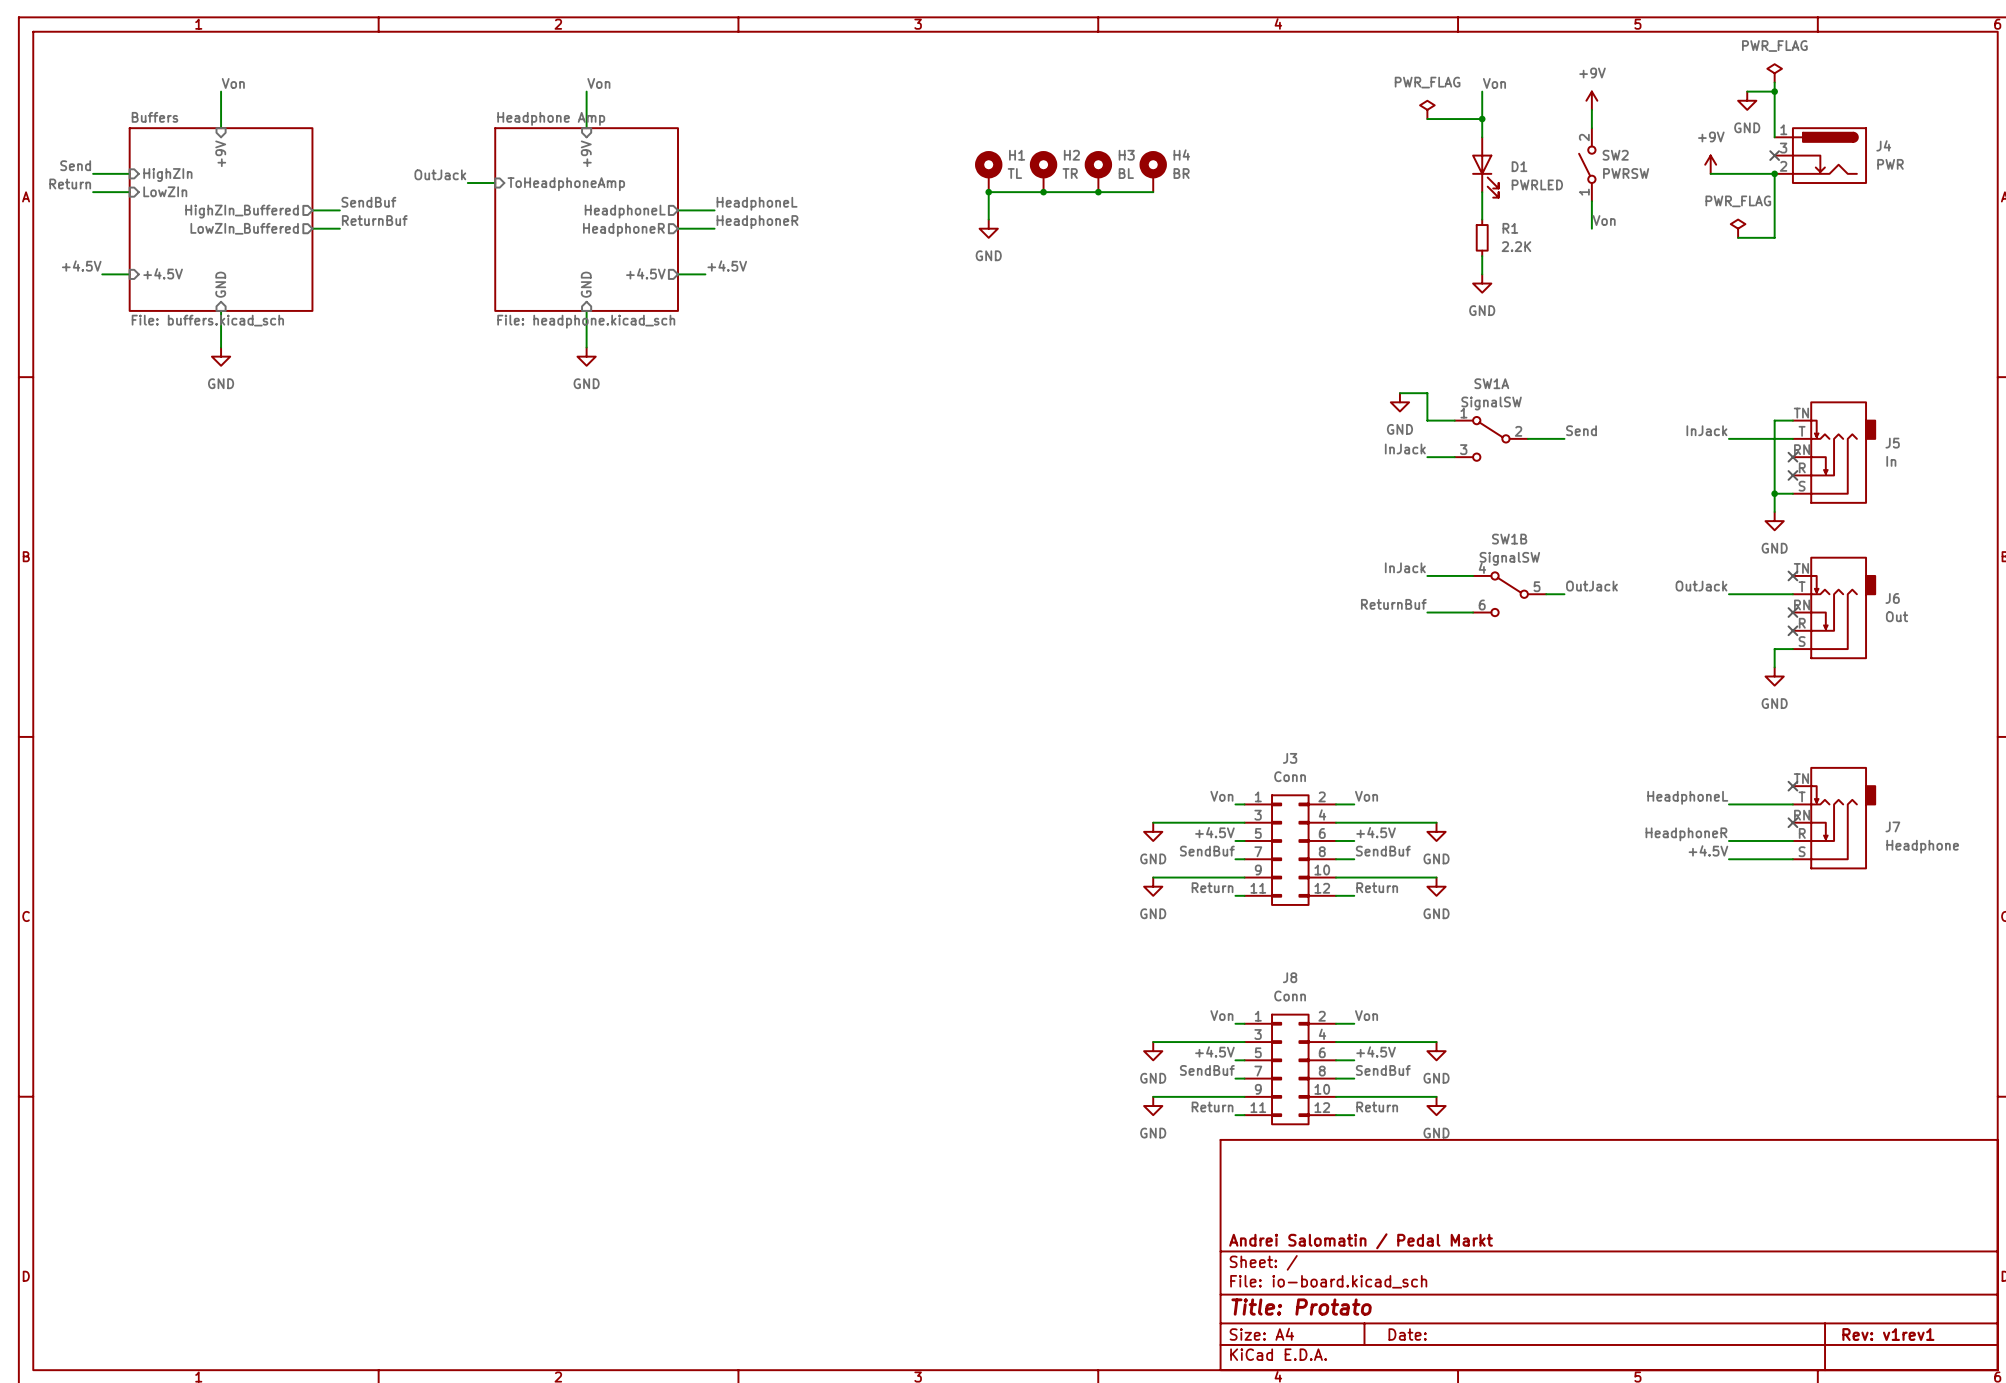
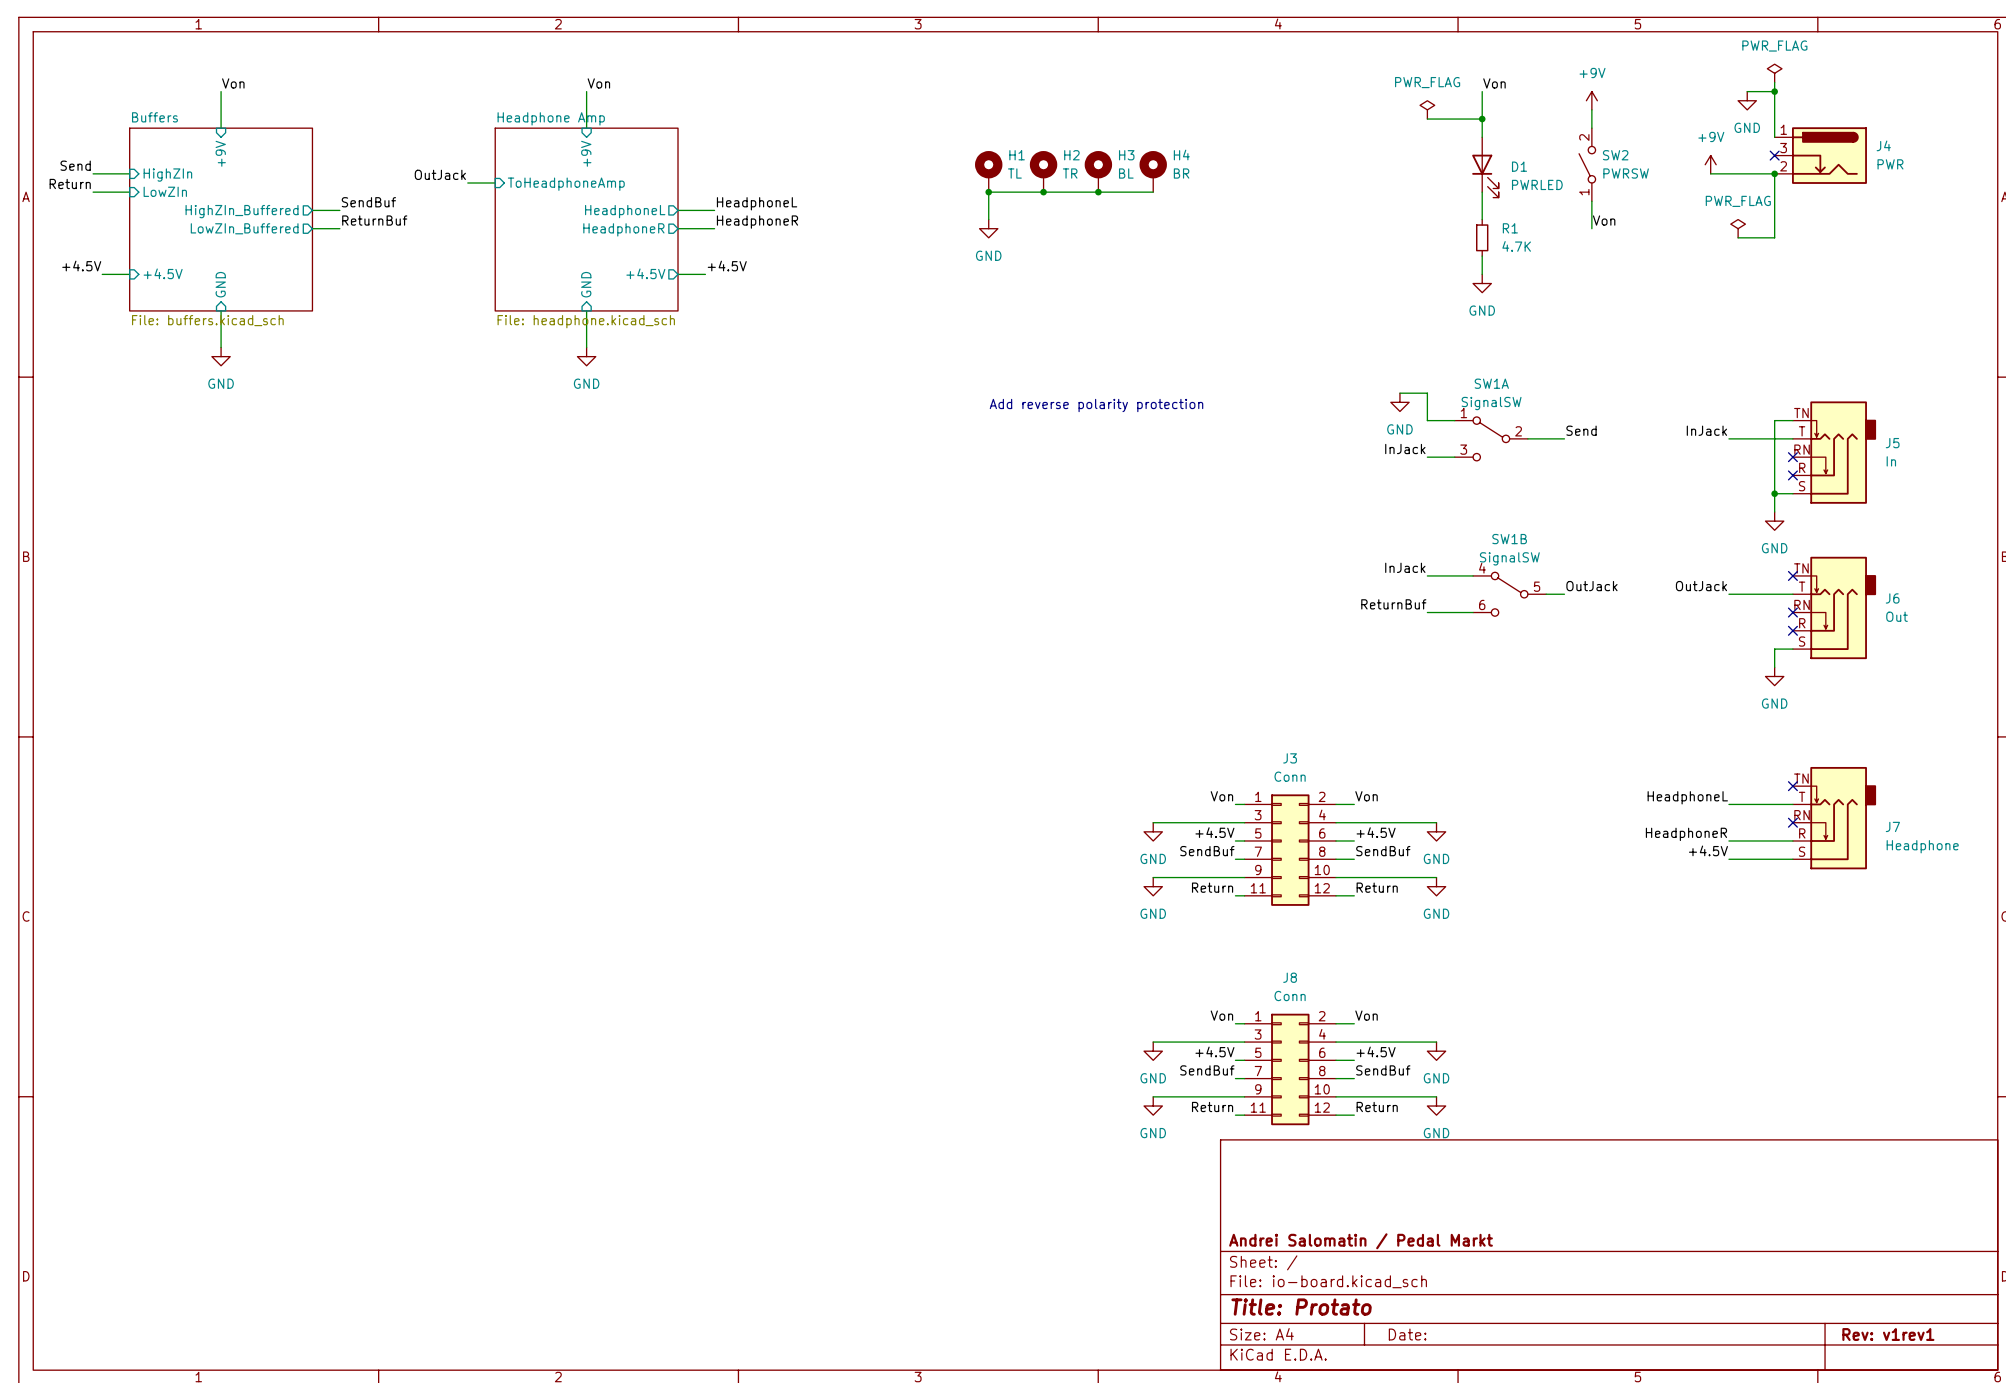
R1 value: 2.2K (1516, 246) -> 4.7K (1516, 246)
text: none -> Add reverse polarity protection (1096, 405)

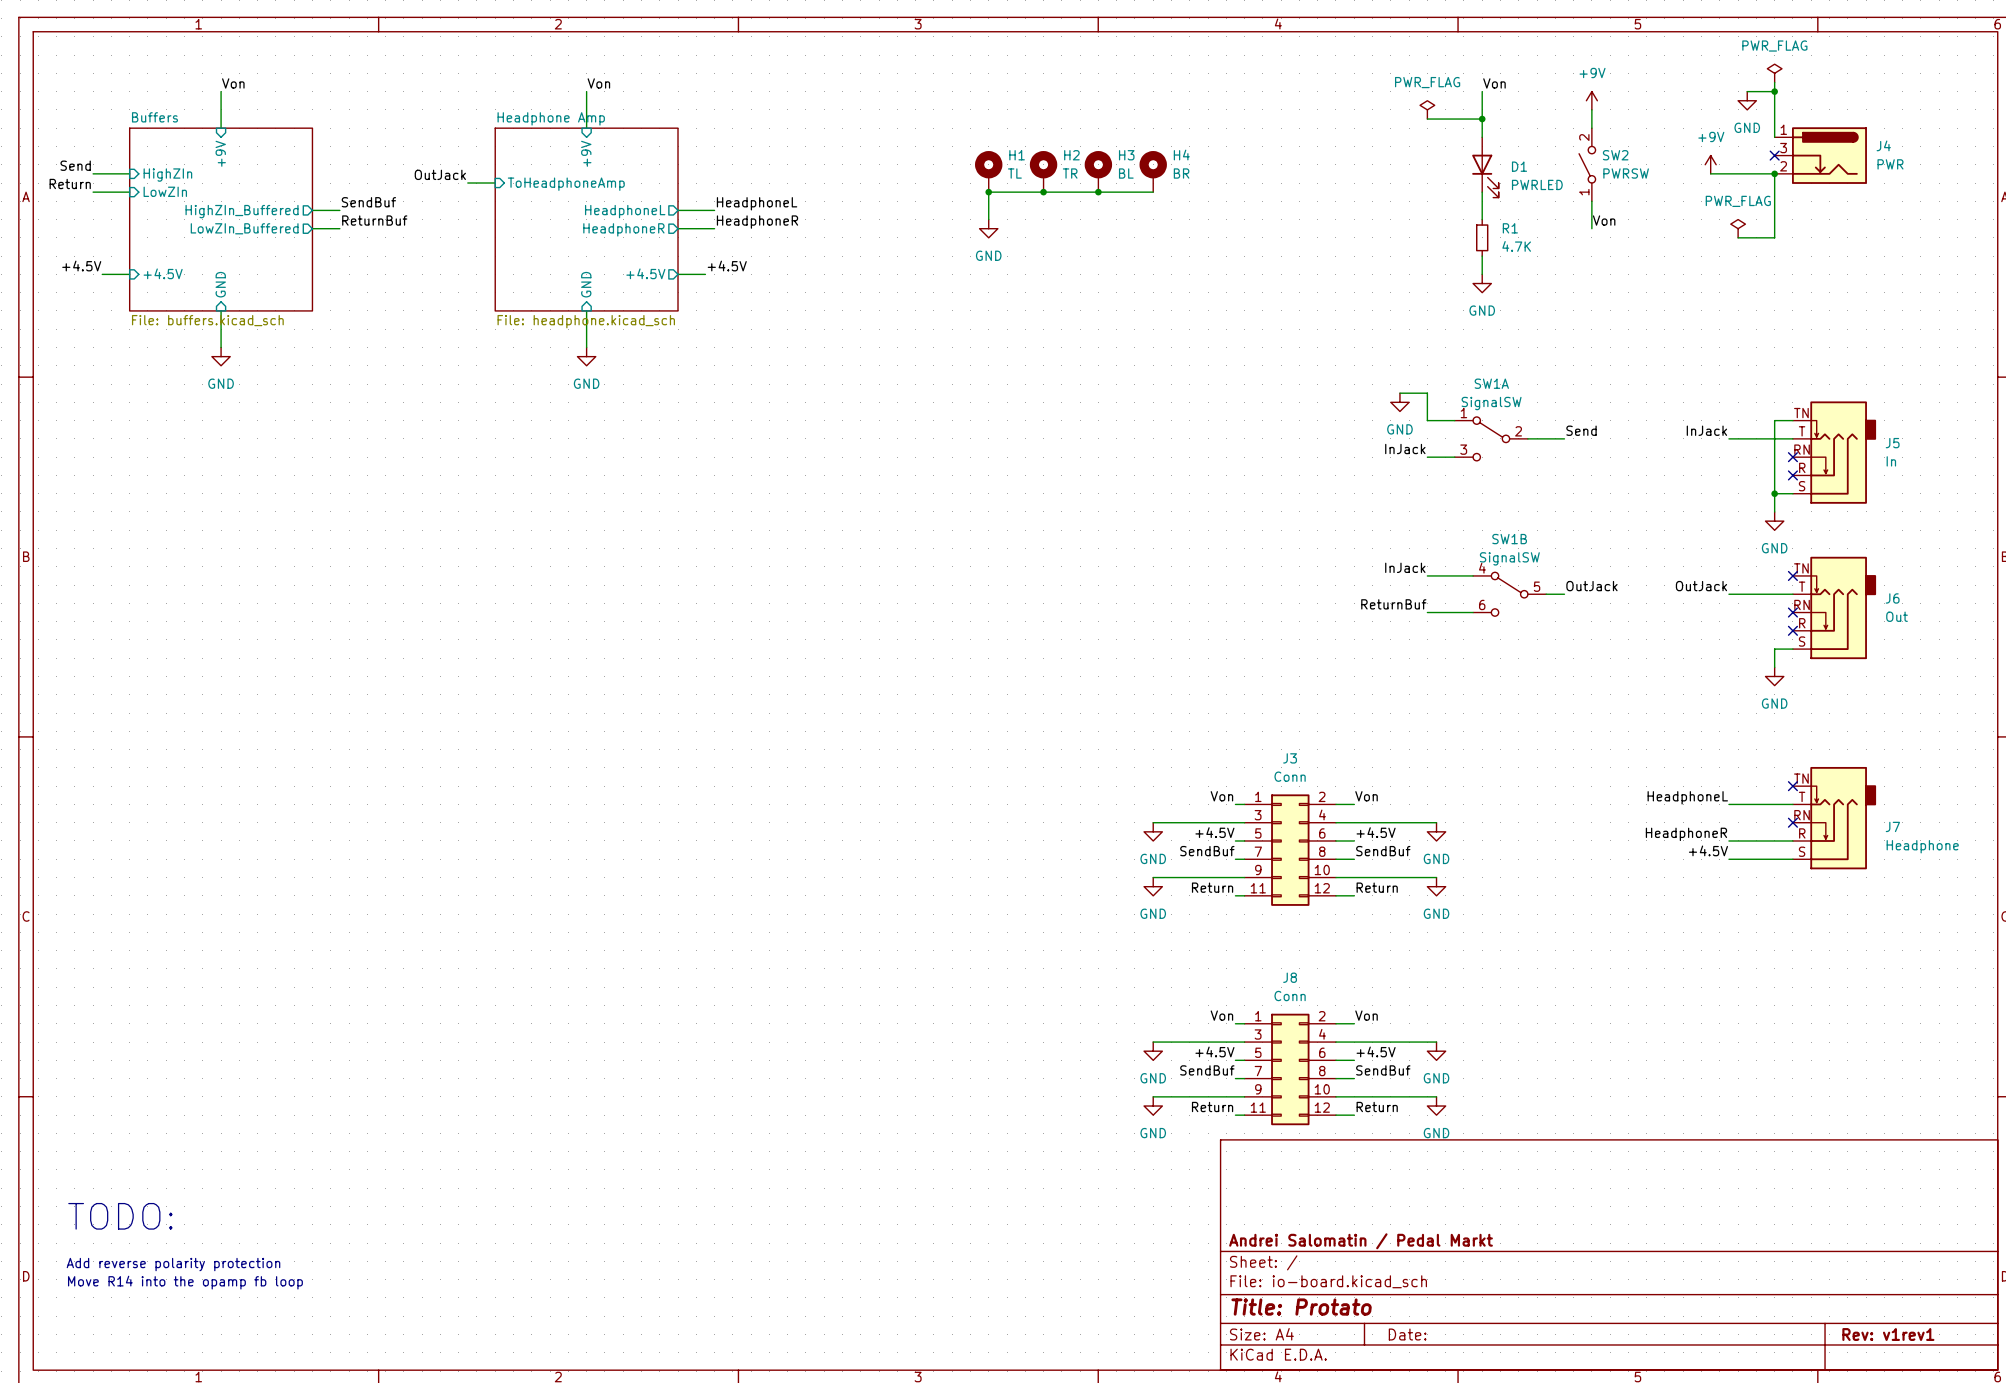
text: Add reverse polarity protection (1096, 405) -> none
text: none -> TODO: (120, 1216)
text: none -> Add reverse polarity protection (173, 1264)
text: none -> Move R14 into the opamp fb loop (185, 1282)

